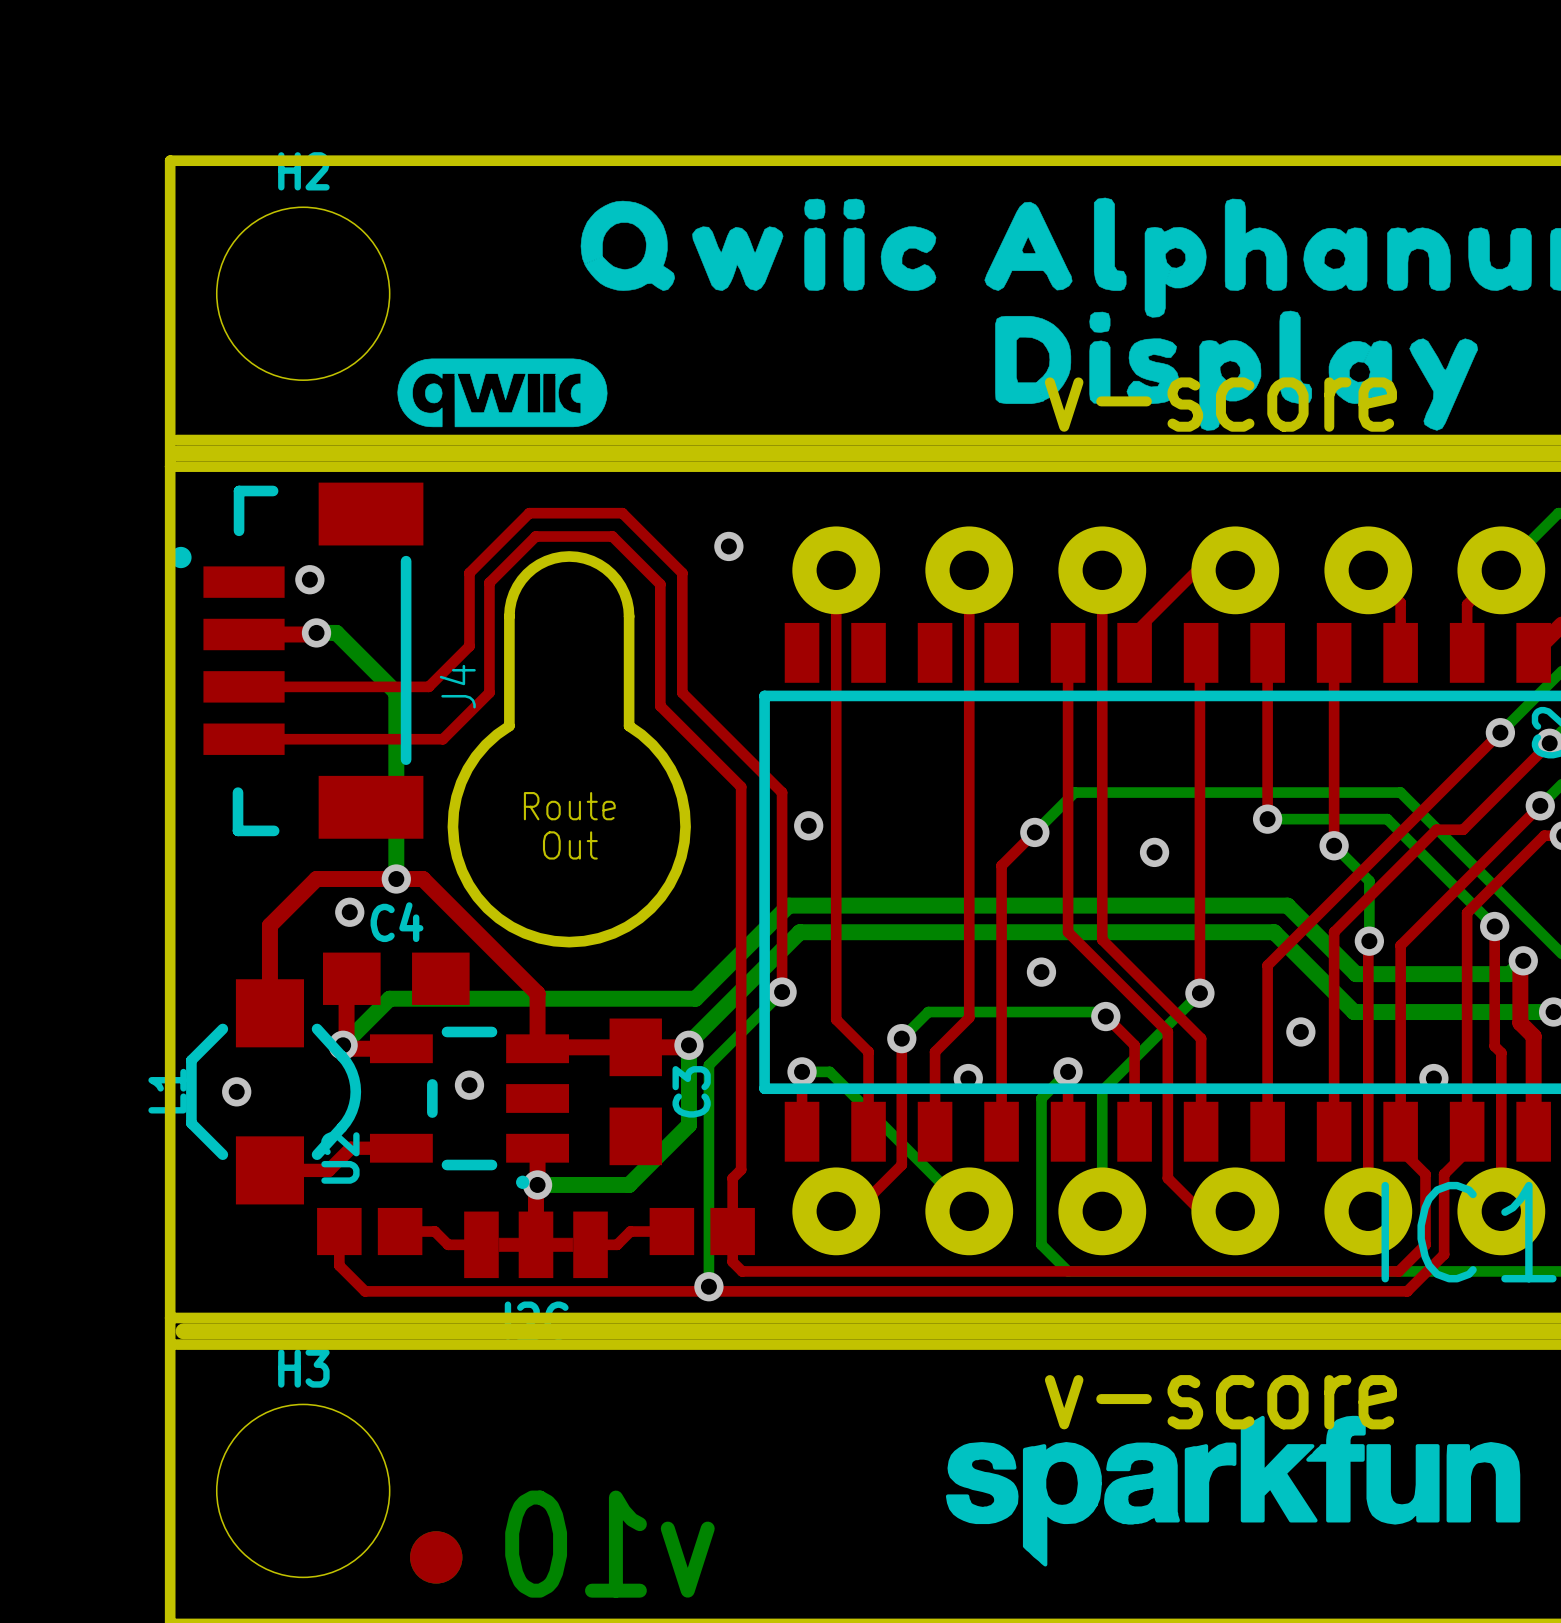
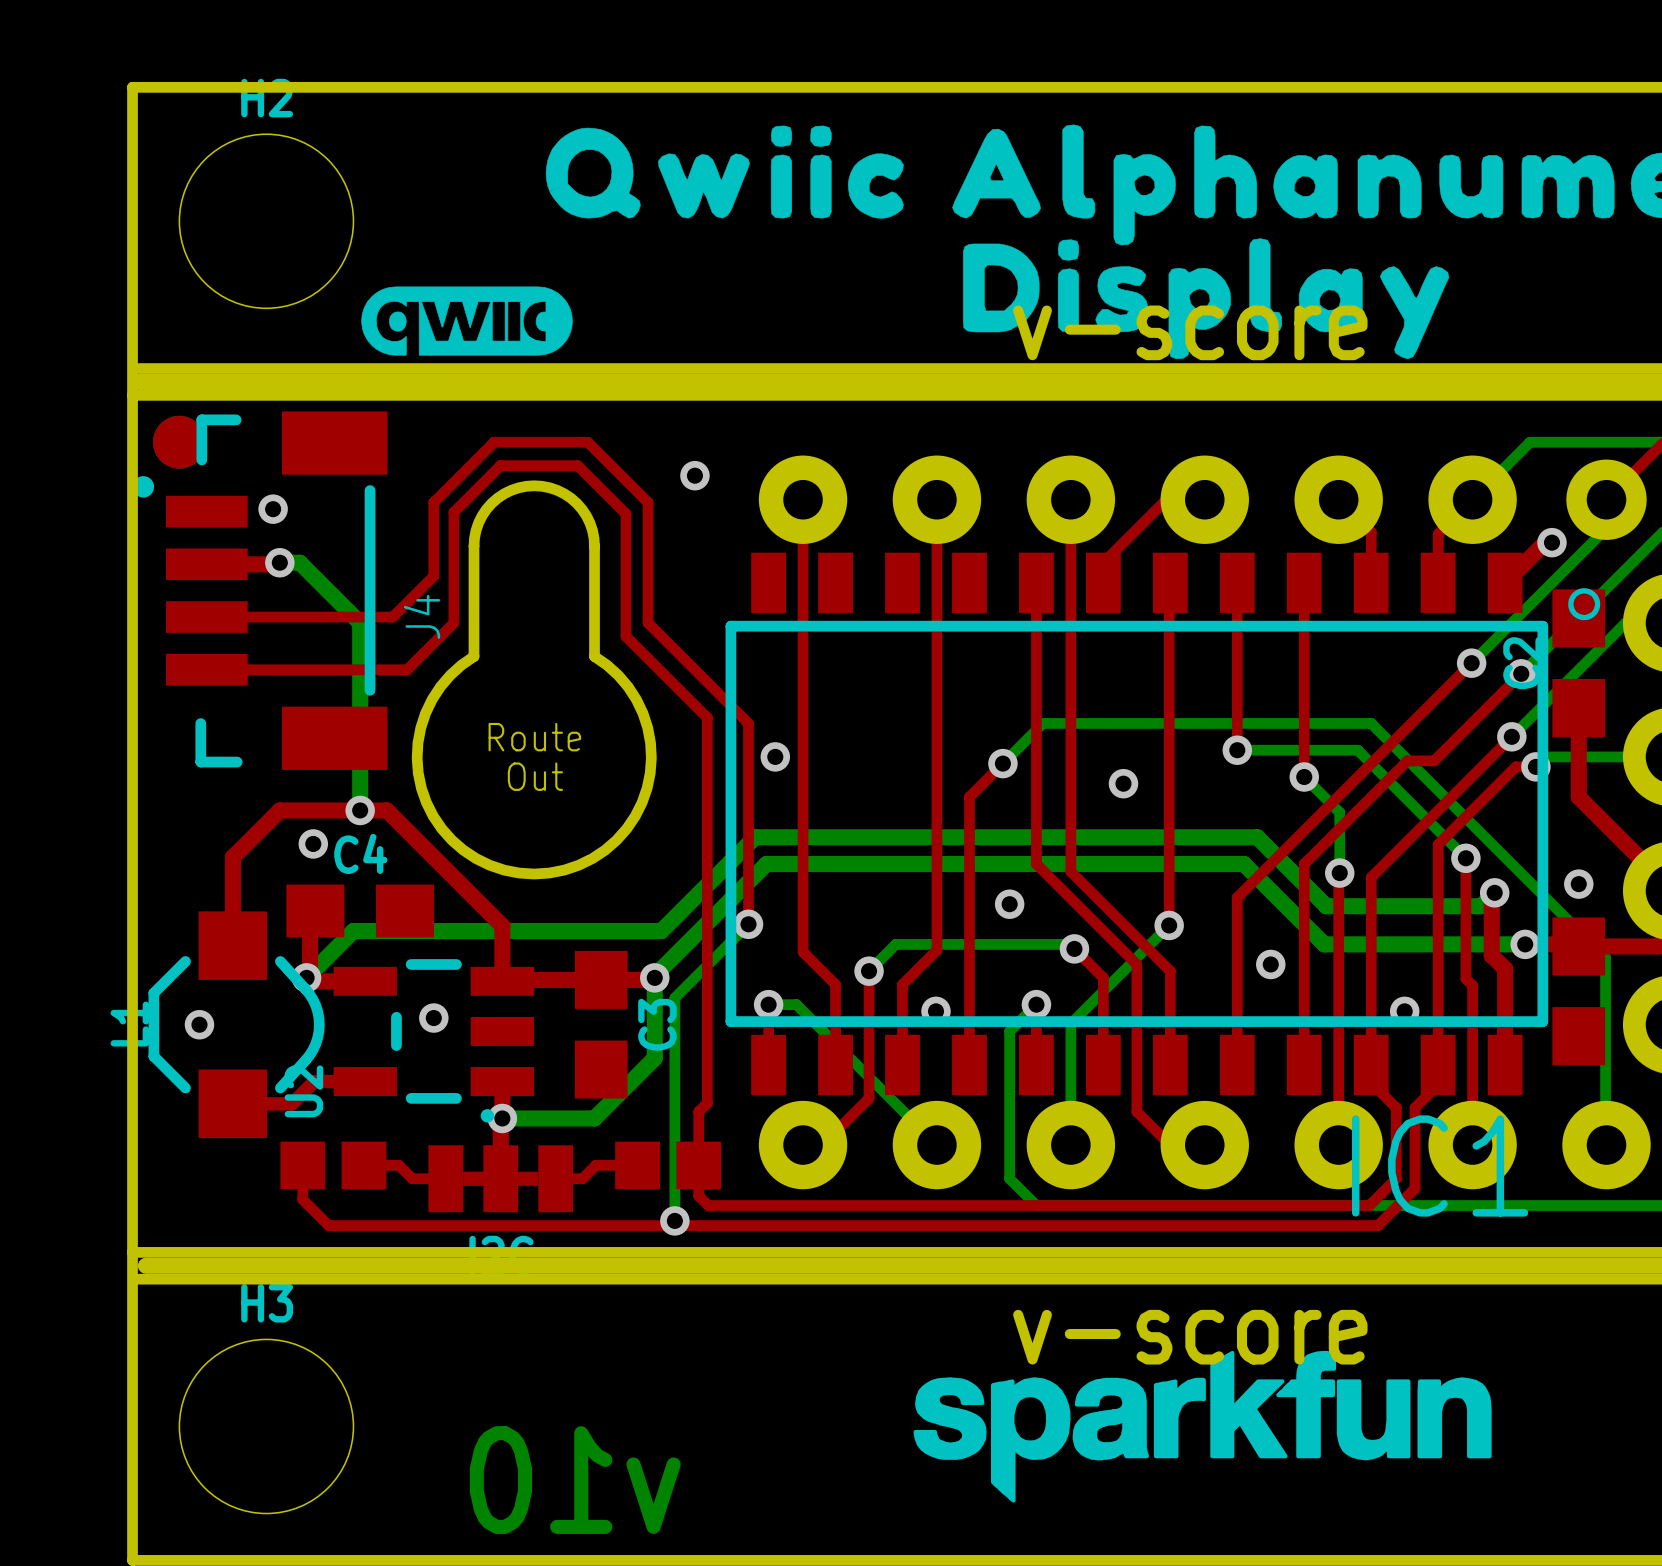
part position: (436, 1557) -> (179, 442)

